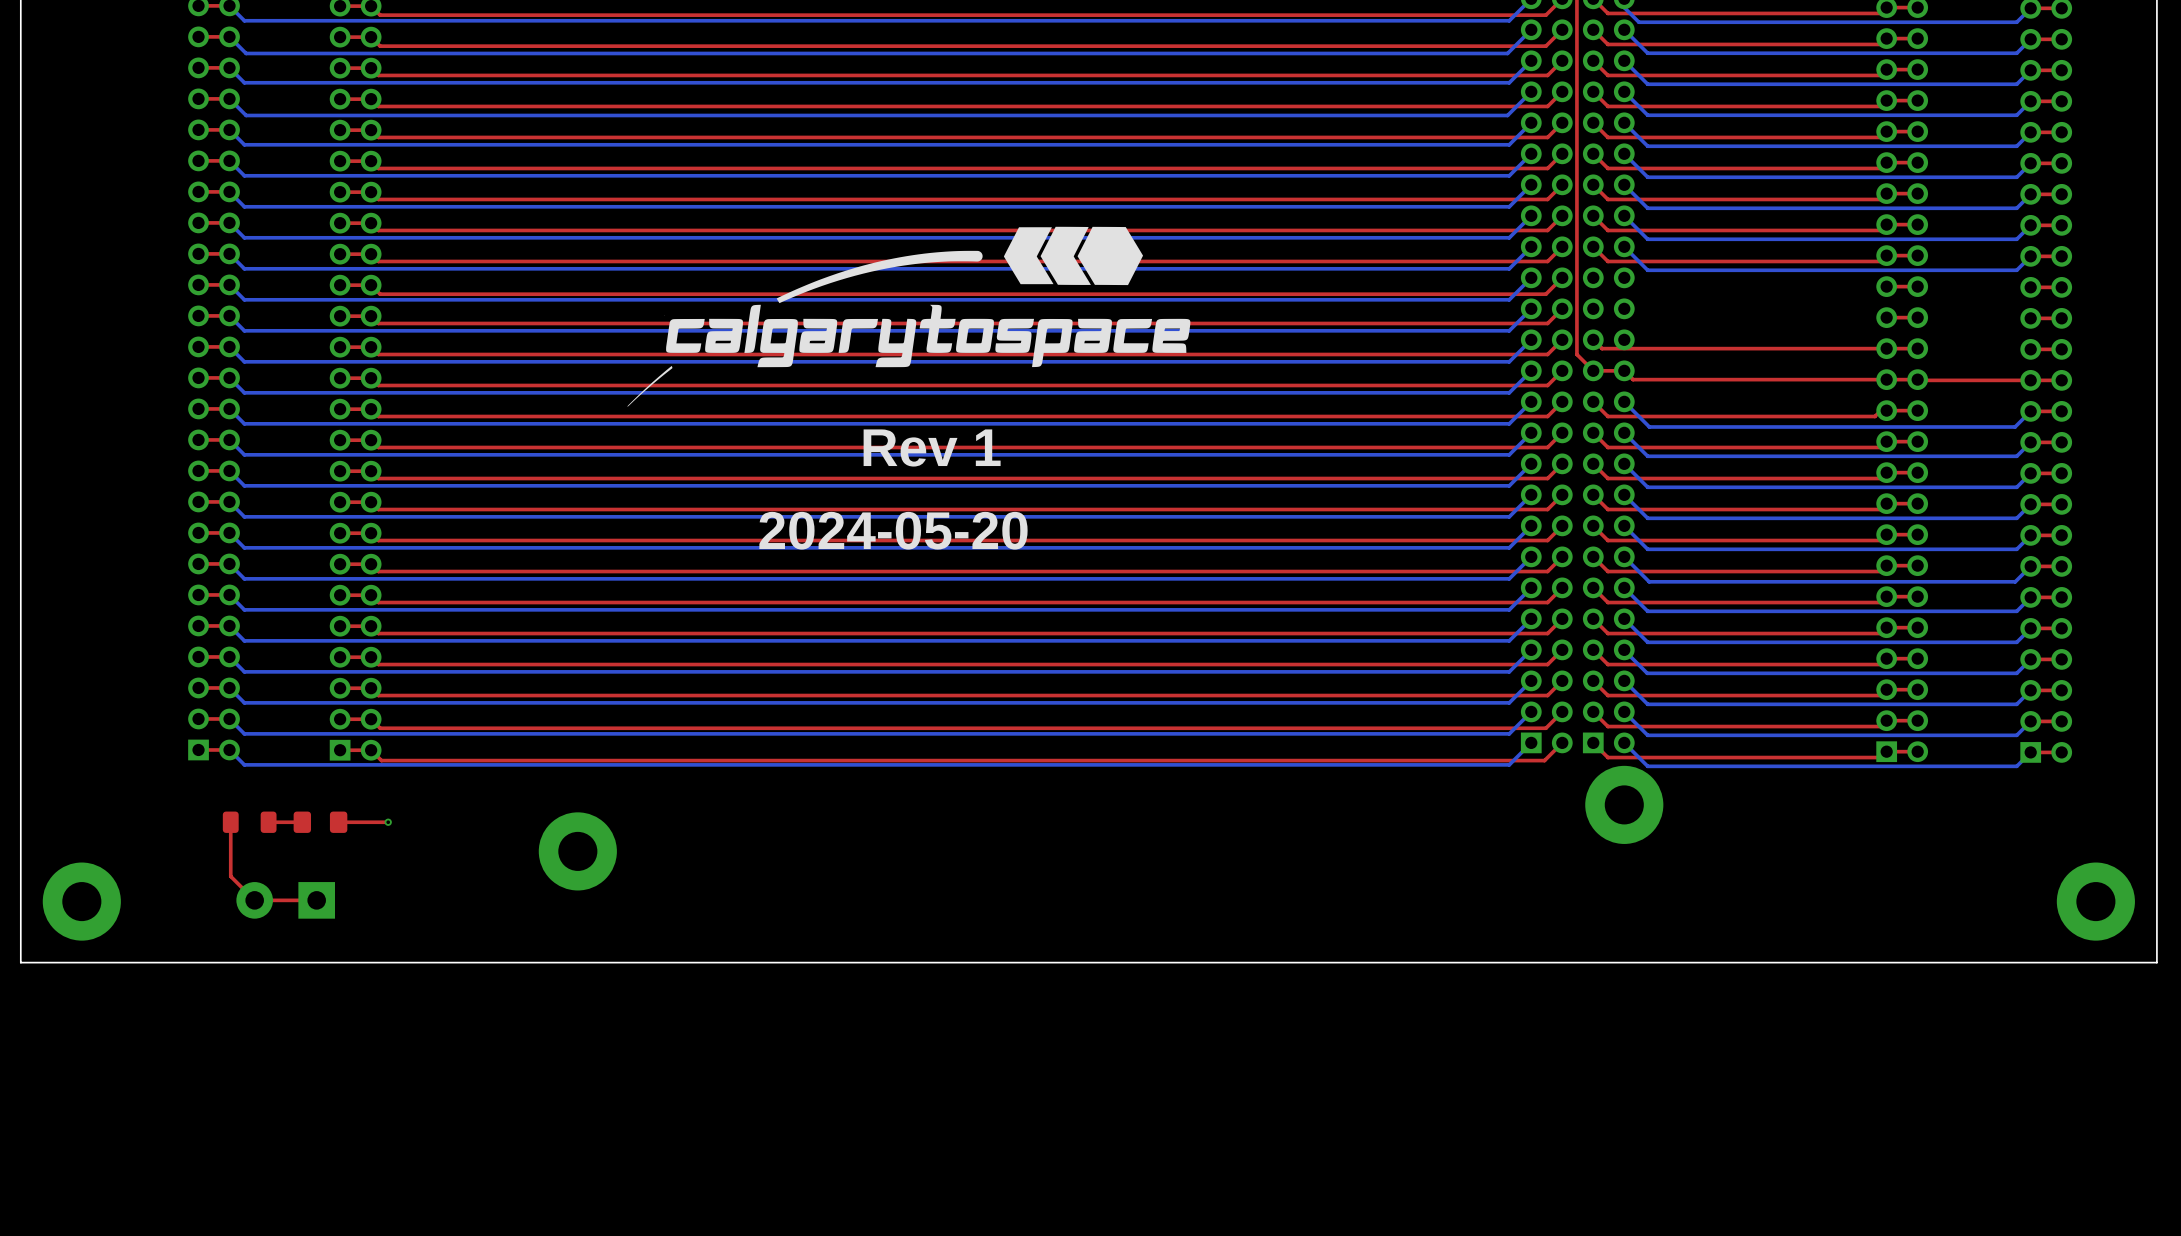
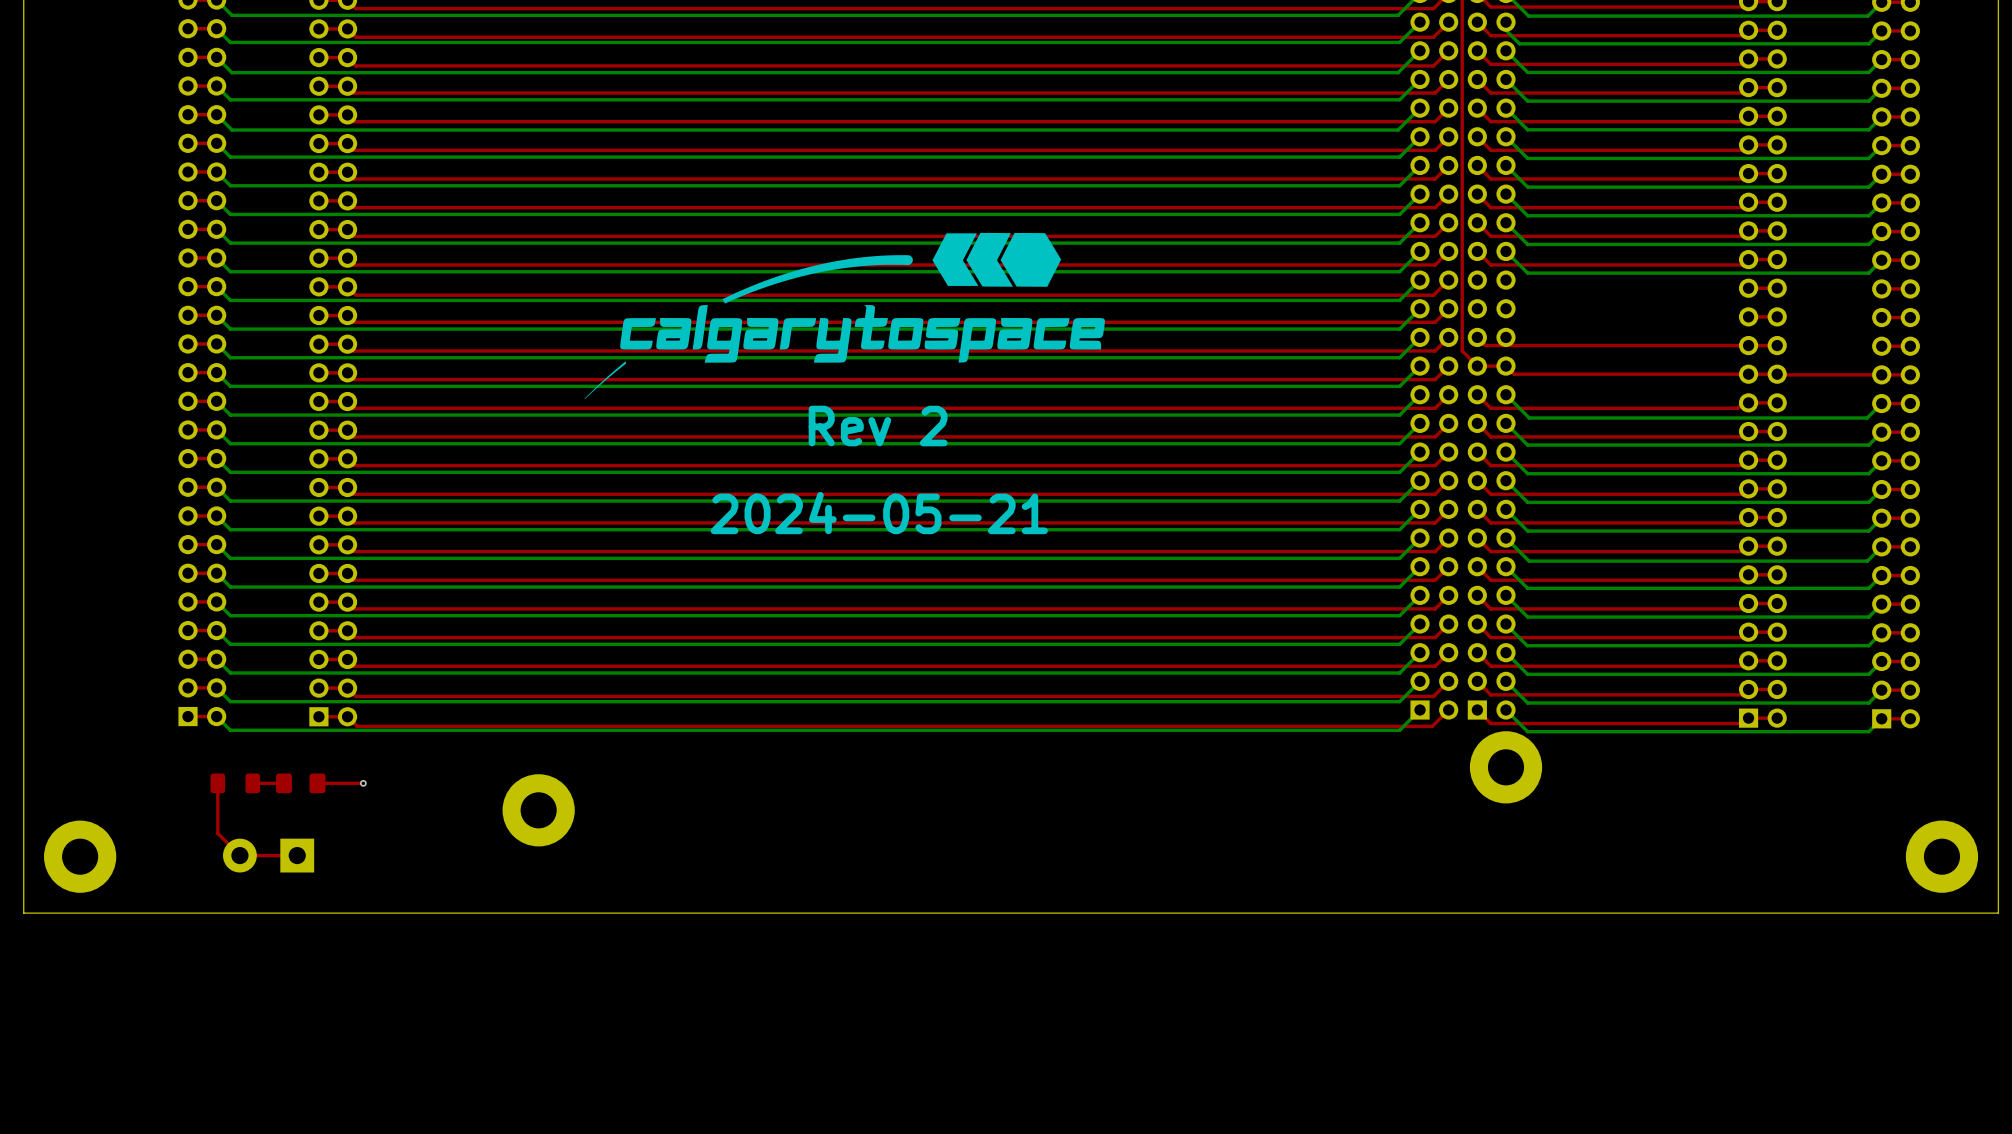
text: Rev 1 (932, 447) -> Rev 2 (878, 426)
text: 2024-05-20 (893, 530) -> 2024-05-21 (879, 513)

